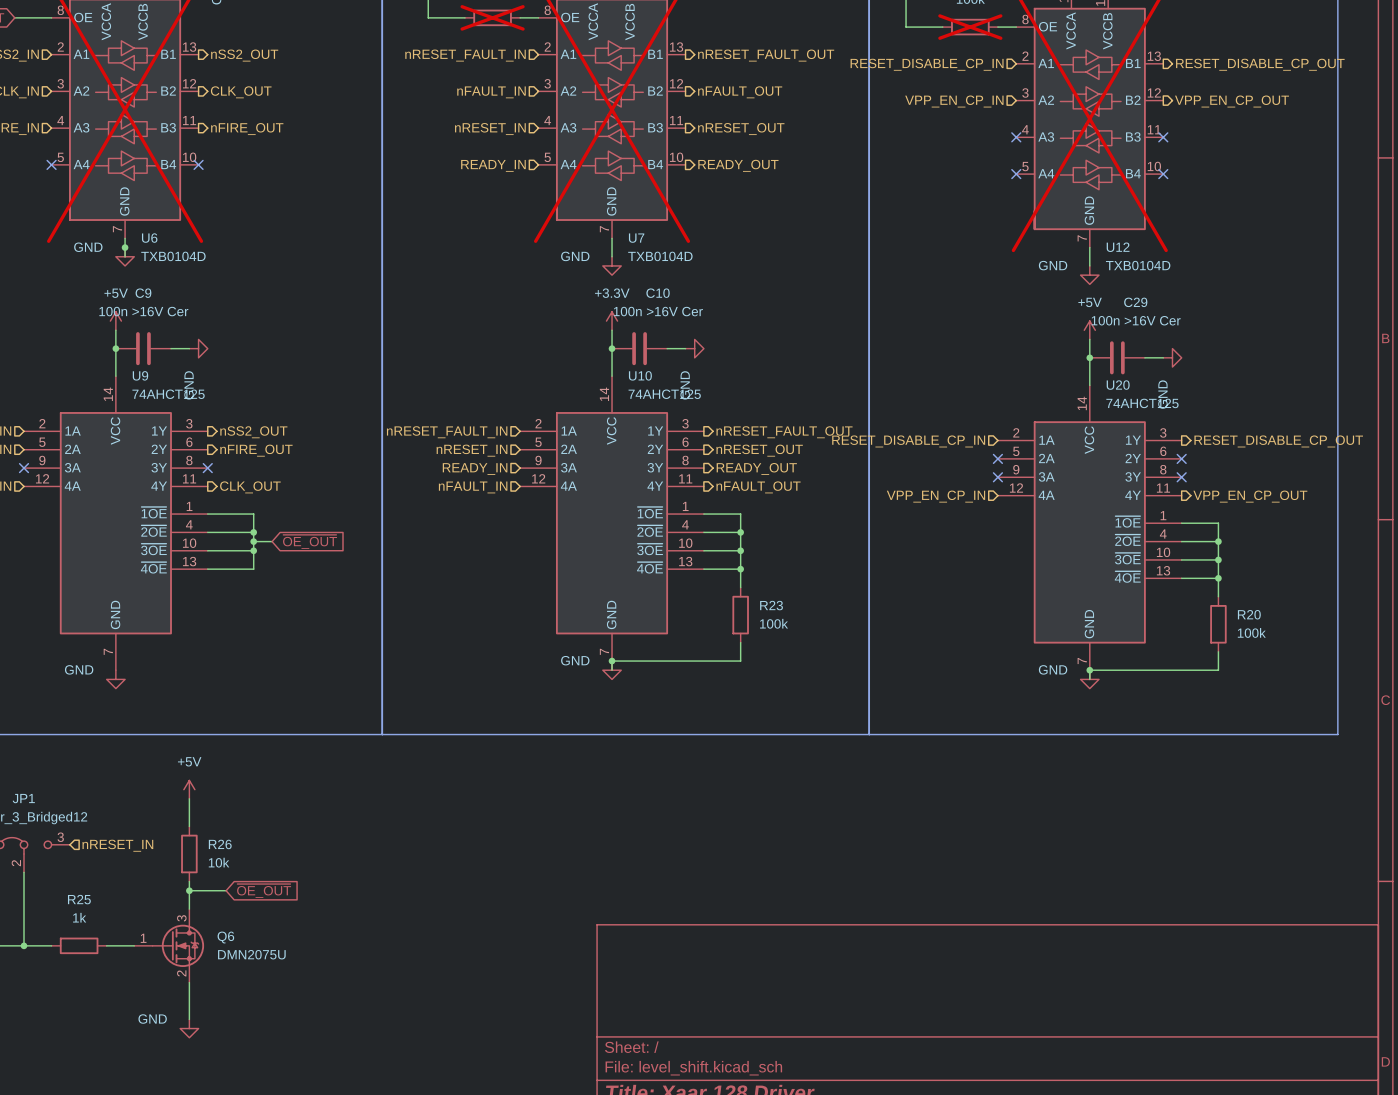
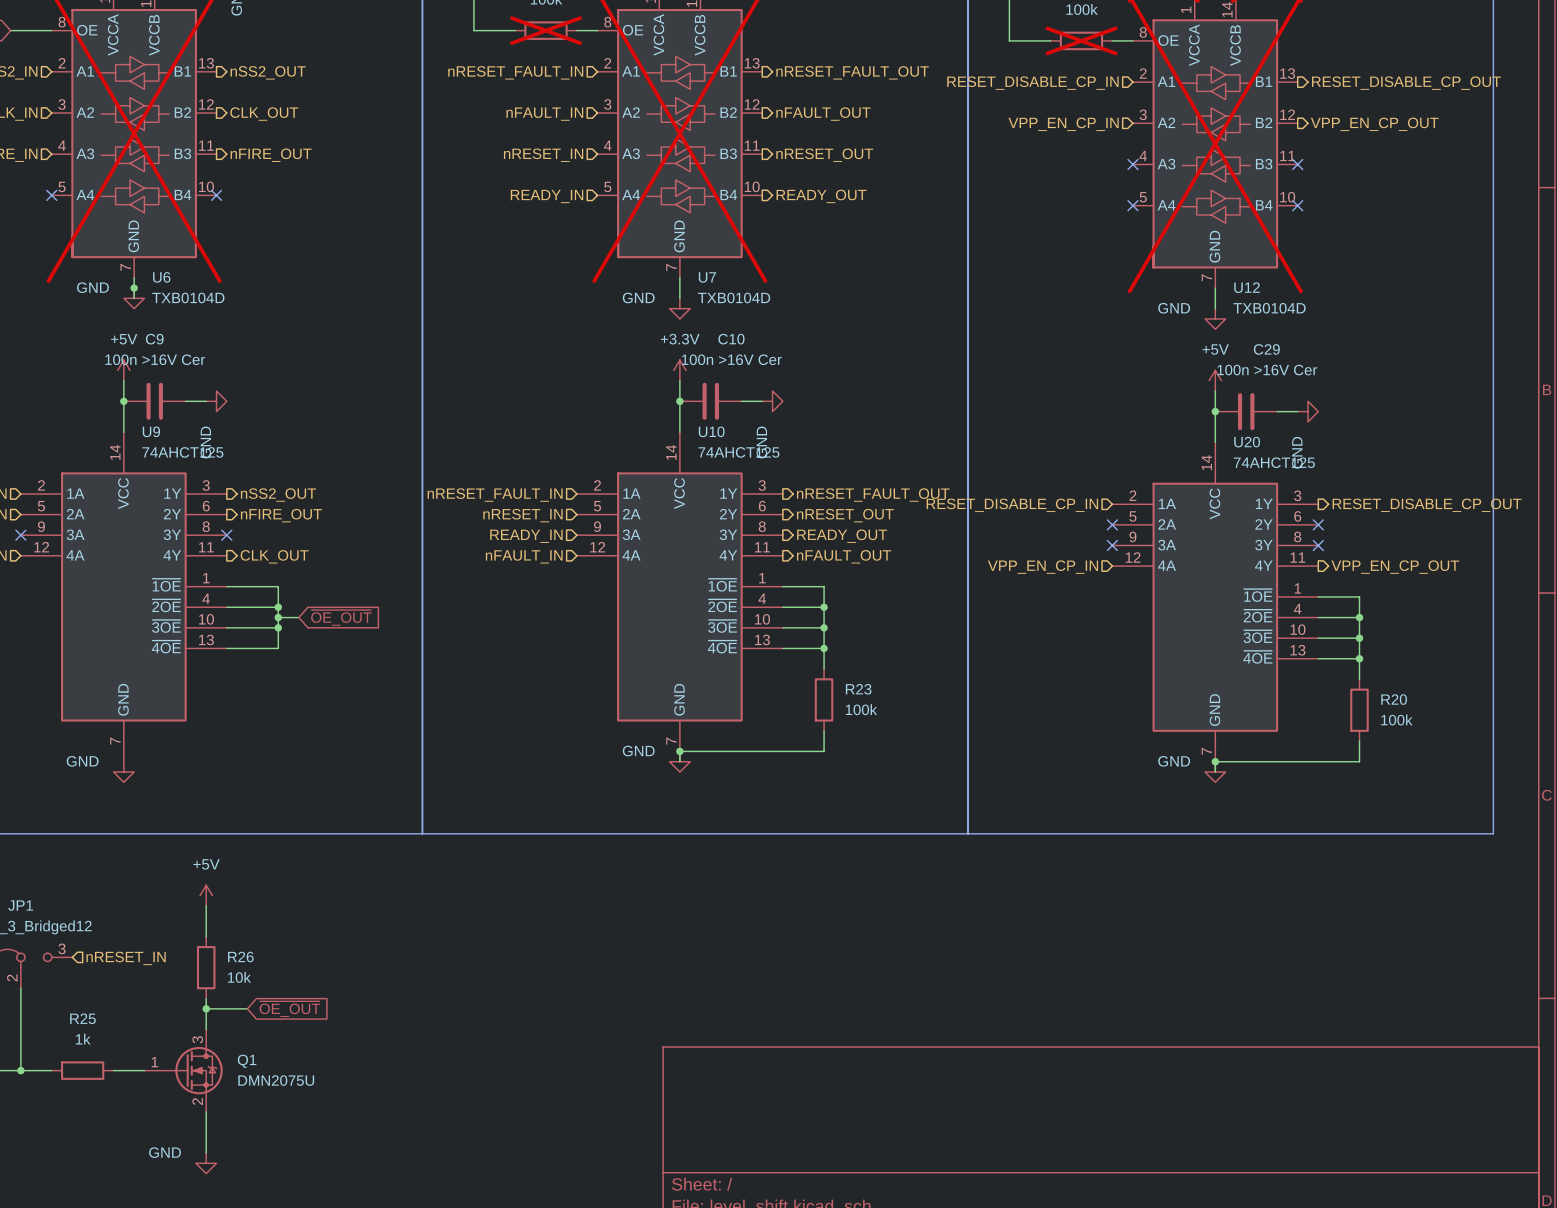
Q6 name: Q6 (225, 937) -> Q1 (247, 1061)

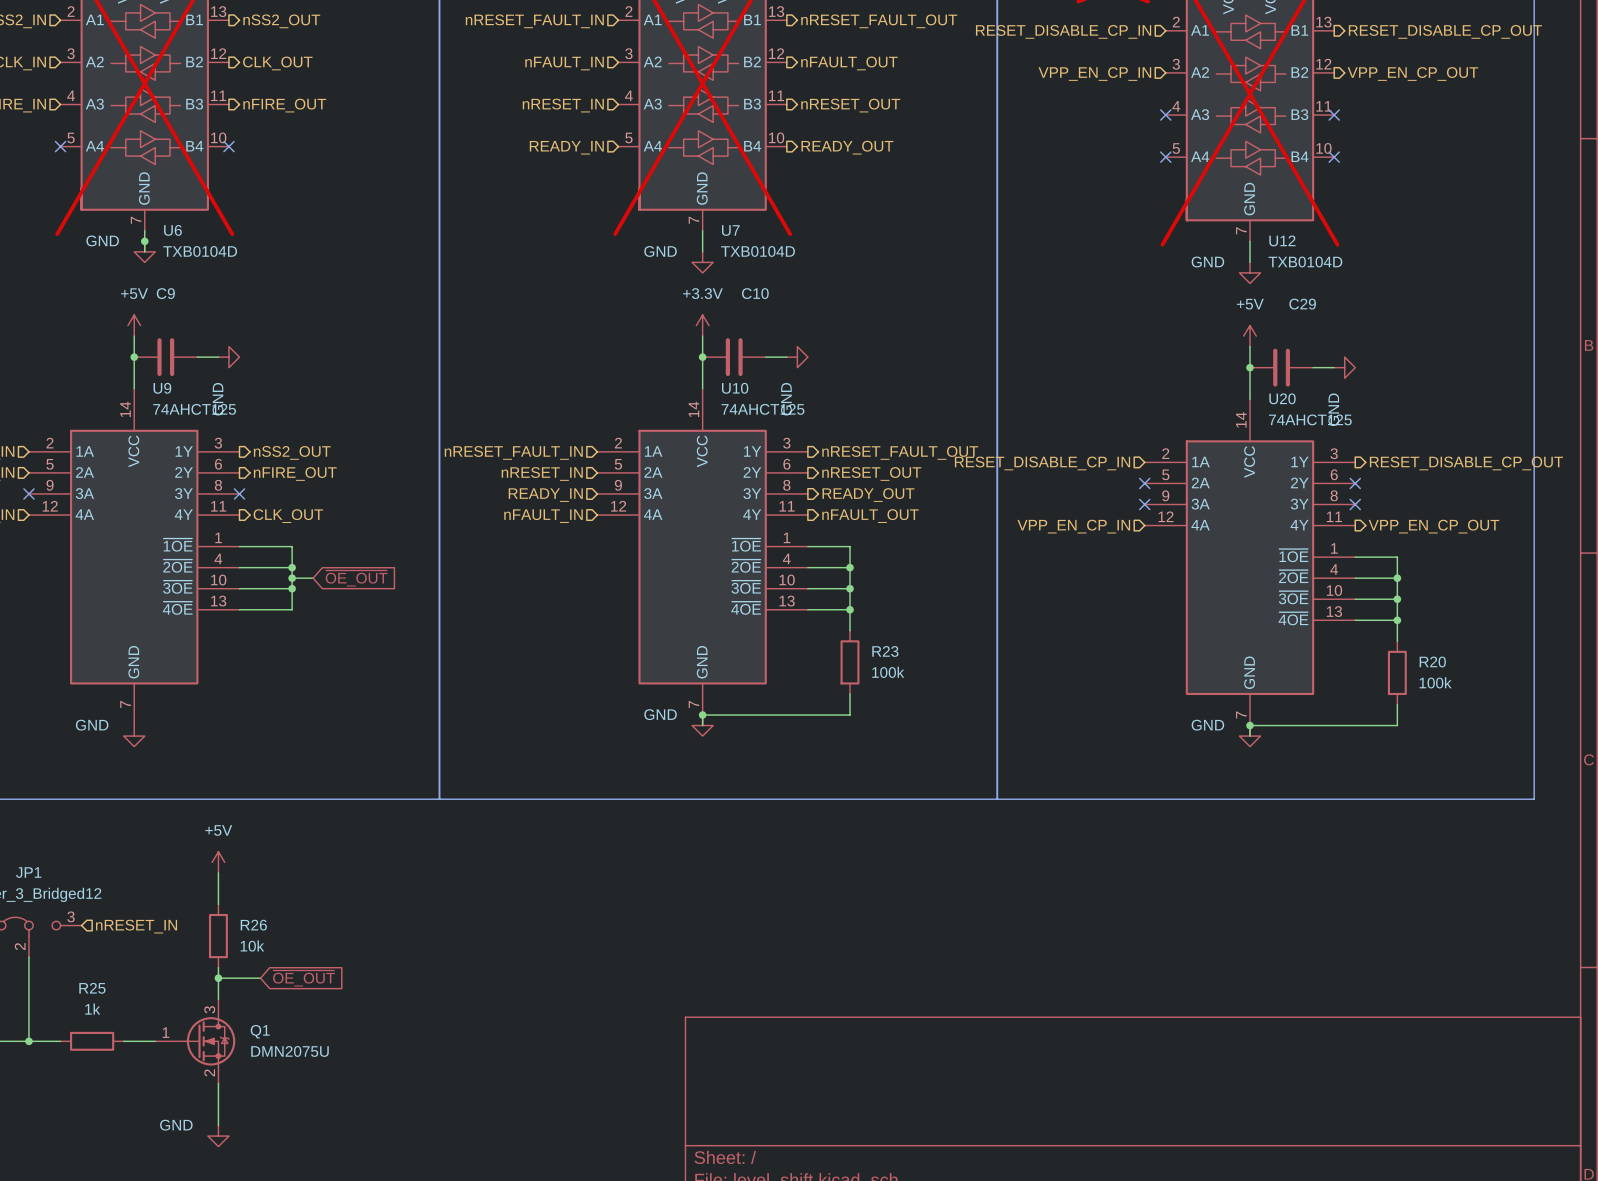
C9 value: 100n >16V Cer (155, 359) -> none
C10 value: 100n >16V Cer (731, 359) -> none
C29 value: 100n >16V Cer (1267, 370) -> none

